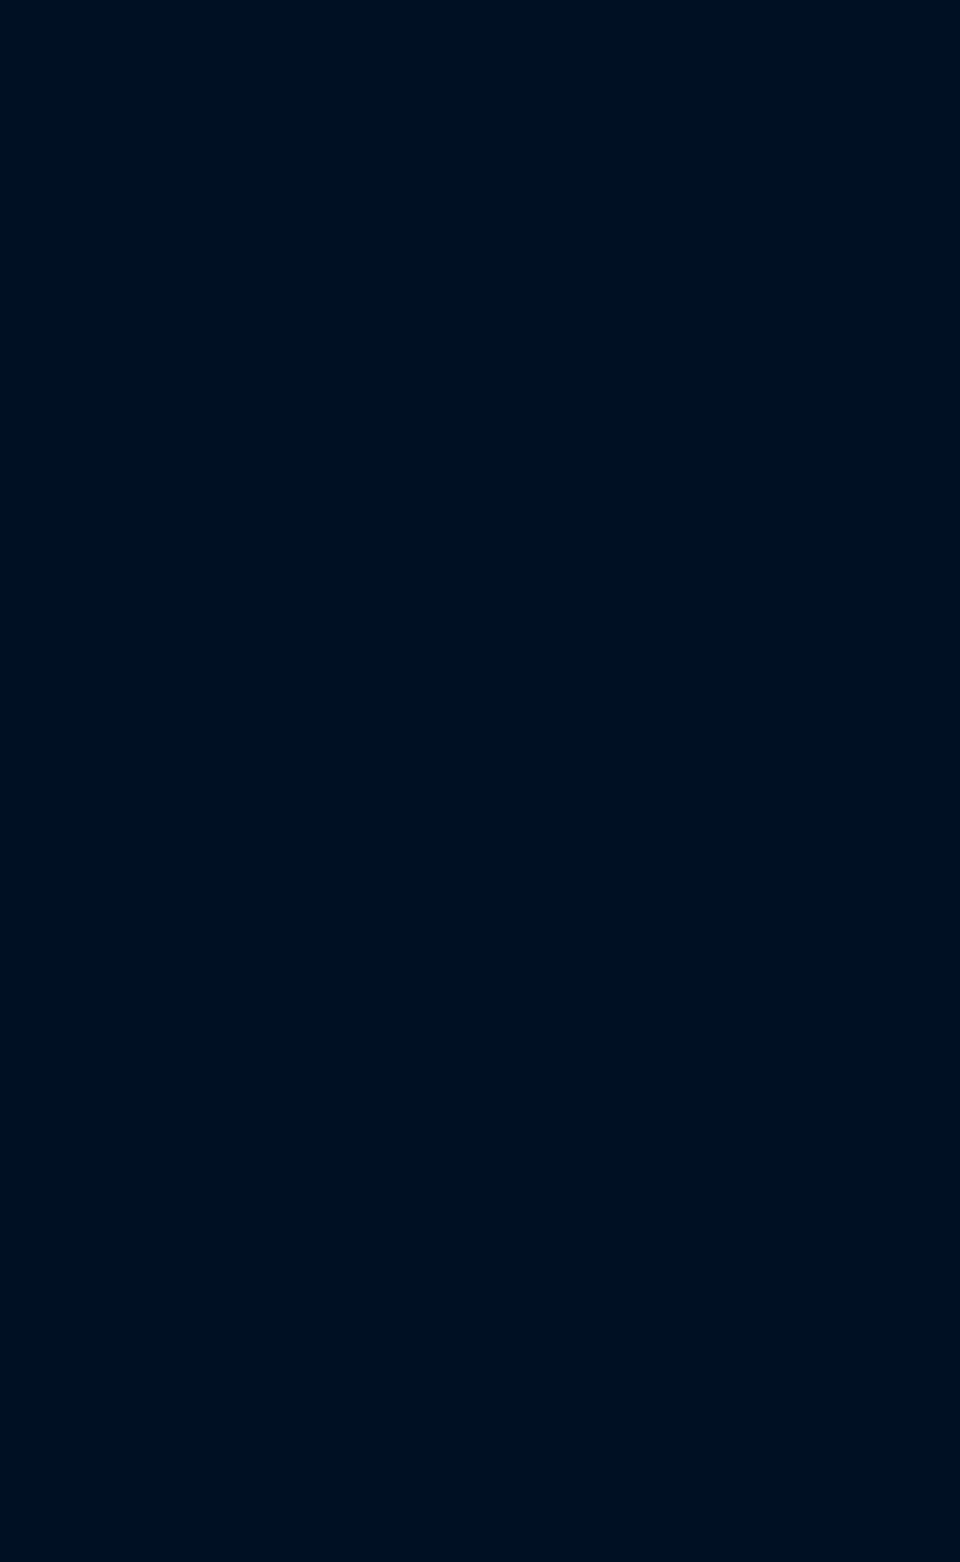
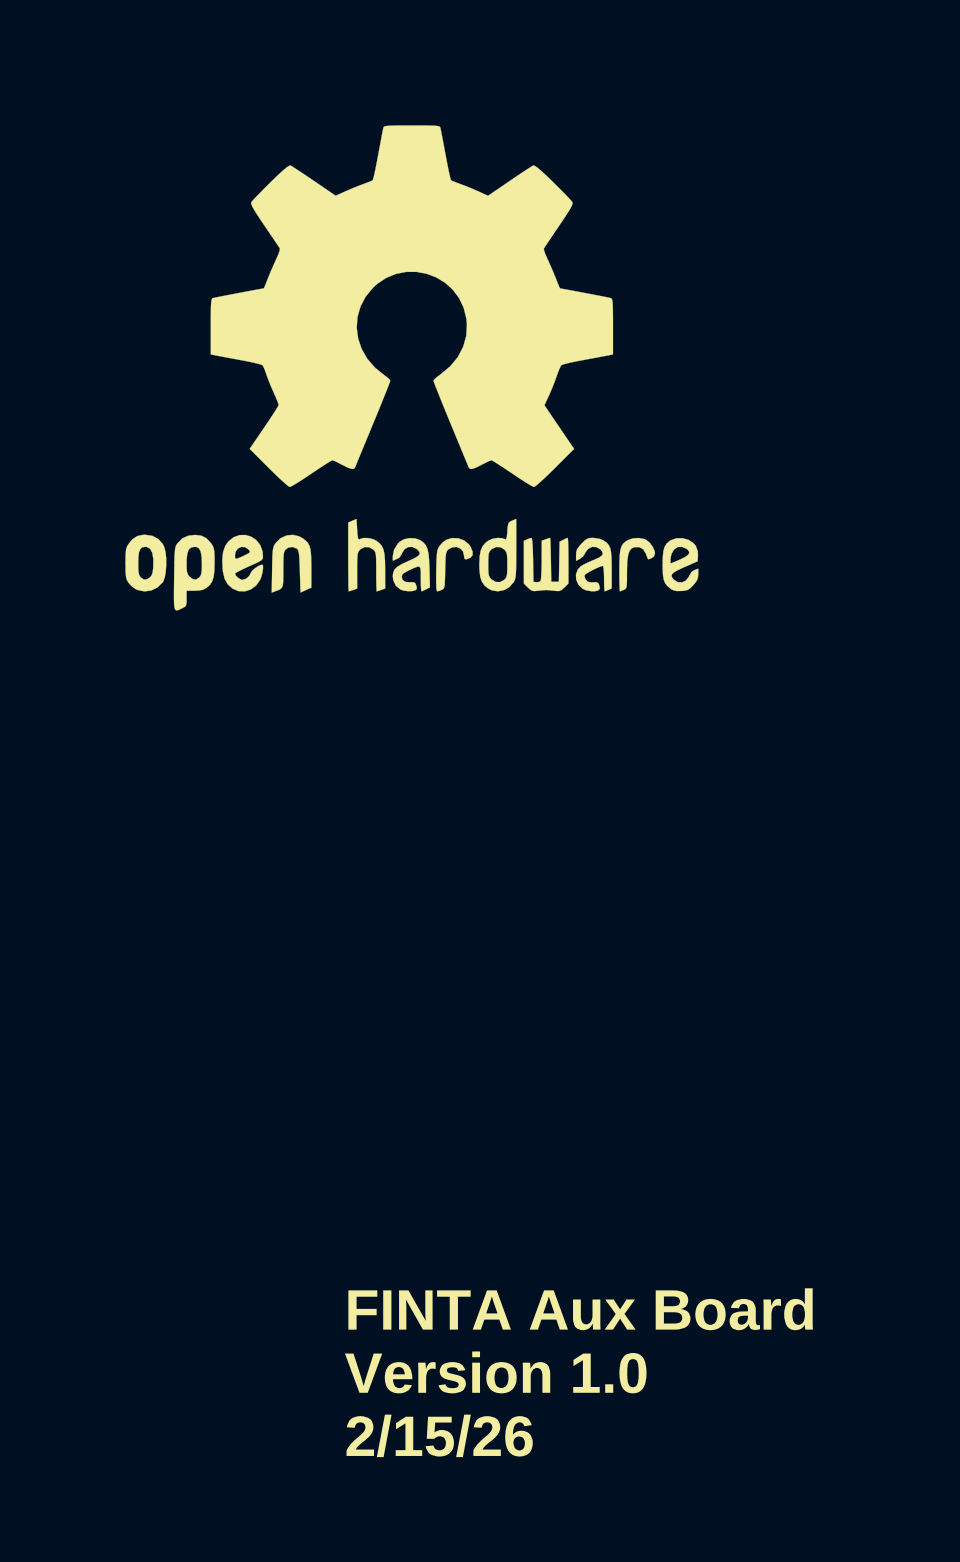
drawing: none -> [125, 125, 699, 611]
text: none -> FINTA Aux Board (580, 1309)
text: none -> Version 1.0 (495, 1372)
text: none -> 2/15/26 (439, 1435)

